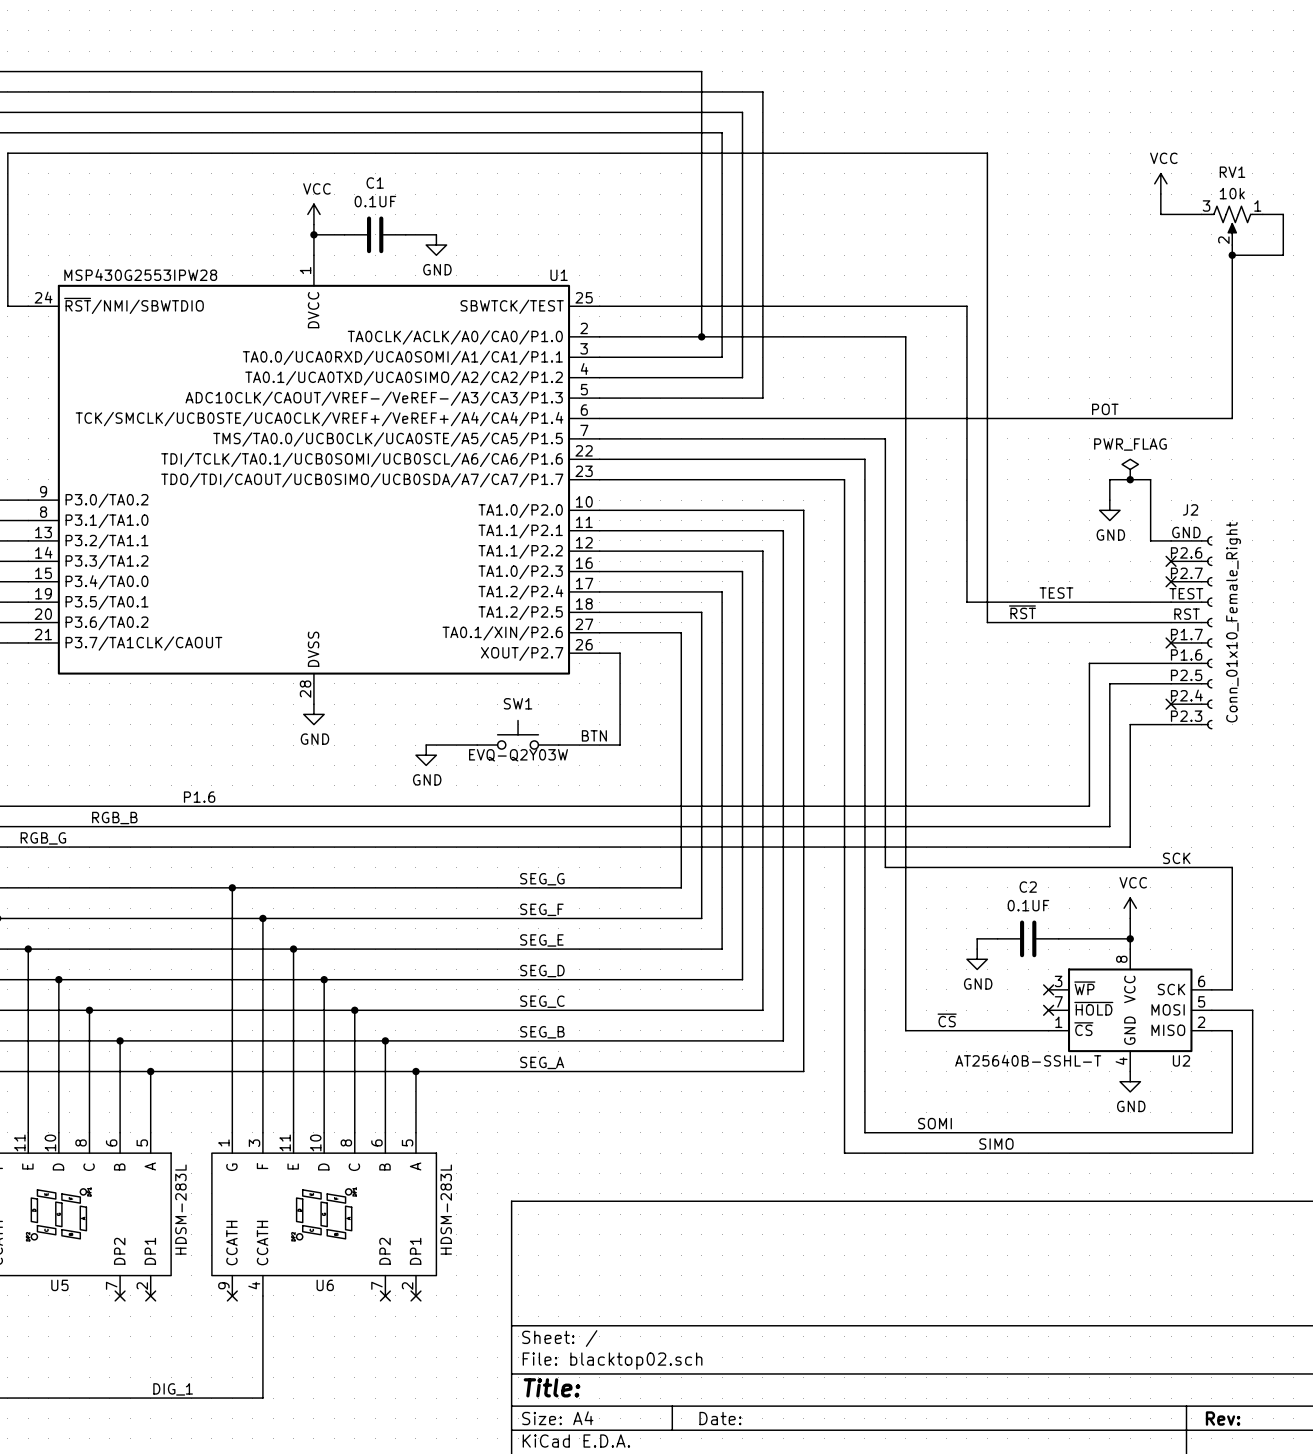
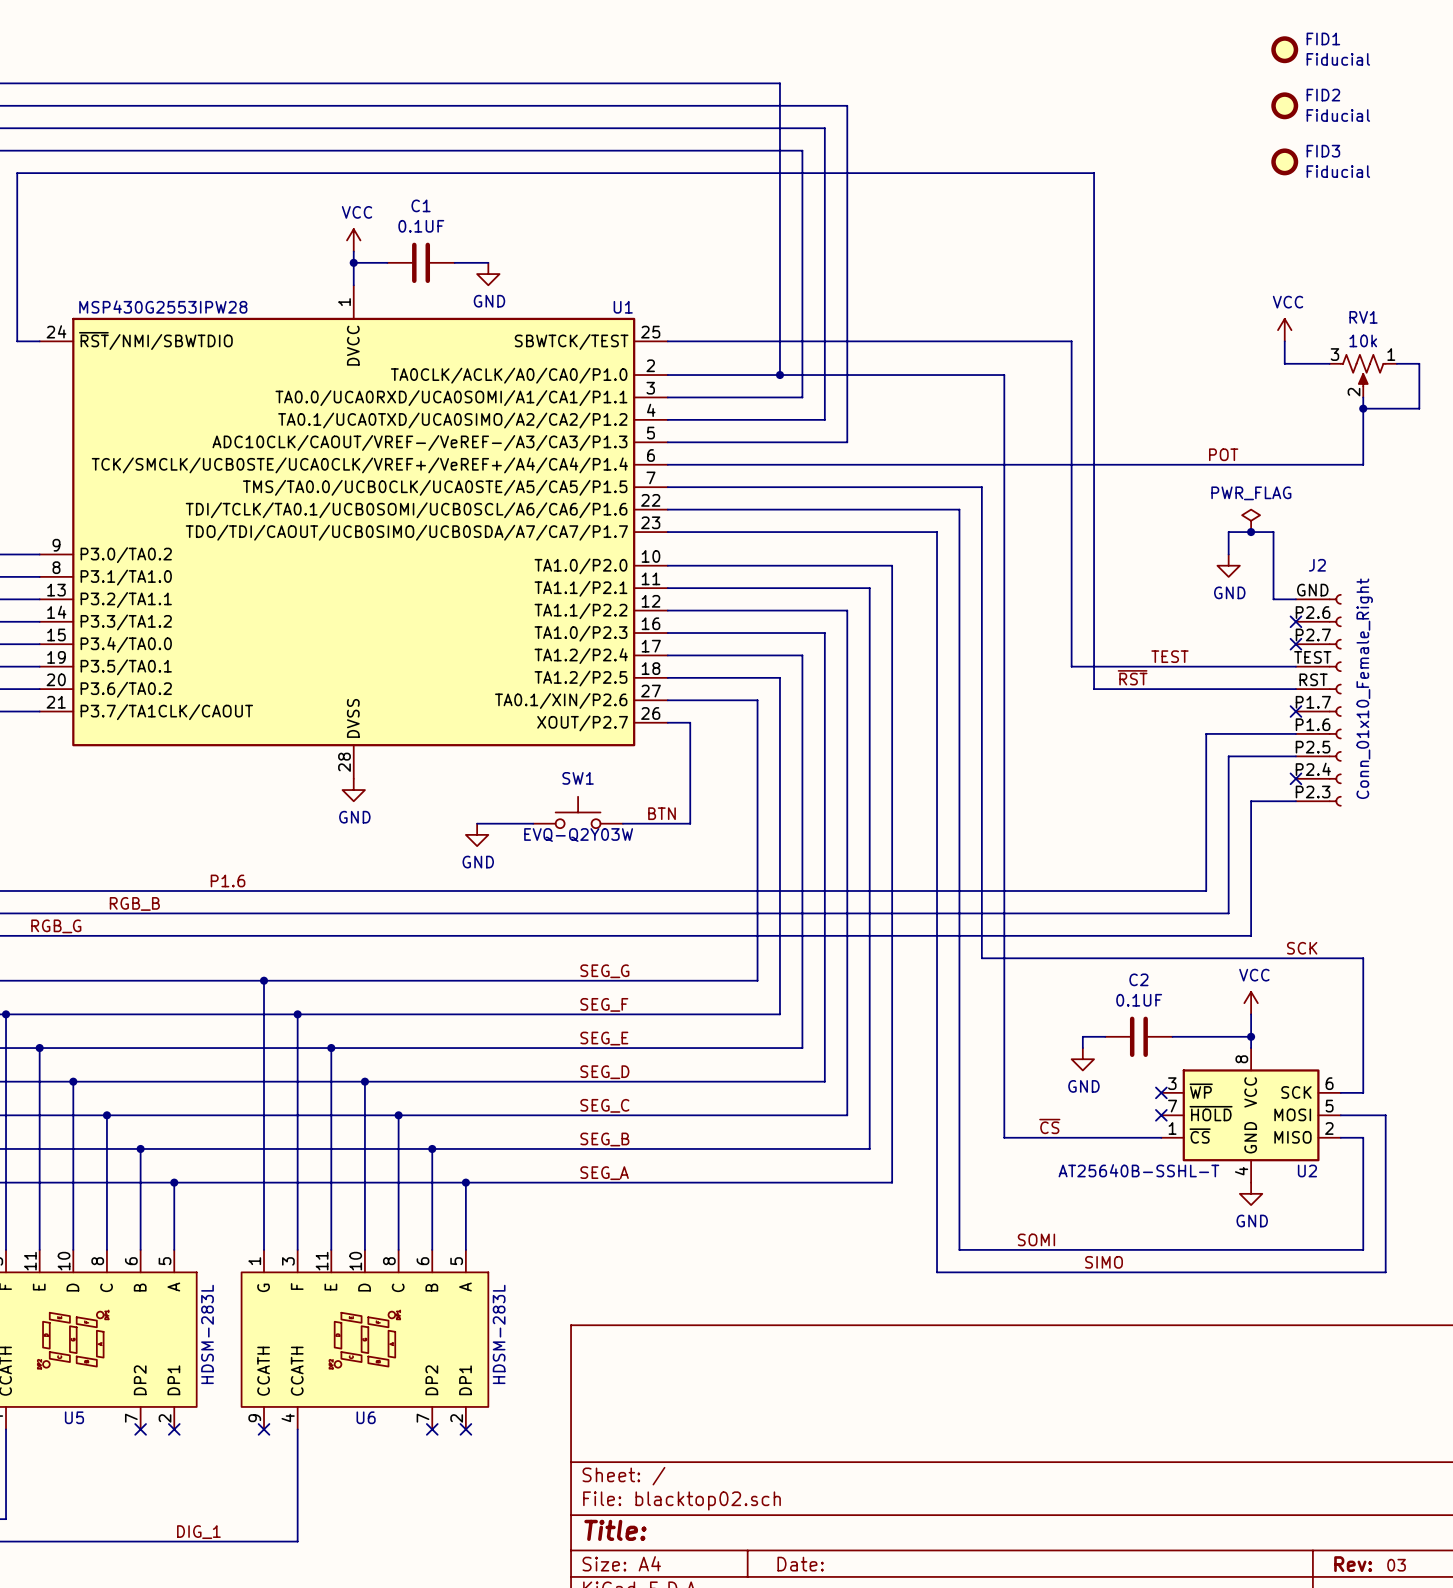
FID1: none -> Fiducial (1284, 49)
FID2: none -> Fiducial (1284, 105)
FID3: none -> Fiducial (1284, 161)
power symbol position: VCC (1160, 183) -> VCC (1284, 330)
wire: (1160, 194) (1160, 214) (1201, 214) -> (1284, 341) (1284, 363) (1329, 363)
wire: (1262, 214) (1283, 214) (1283, 255) (1232, 255) -> (1396, 363) (1419, 363) (1419, 408) (1363, 408)
RV1 position: (1232, 225) -> (1363, 376)
wire: (1232, 245) (1232, 357) -> none
junction: (1232, 255) -> none
junction: none -> (1363, 408)
label: none -> 03 (1396, 1565)

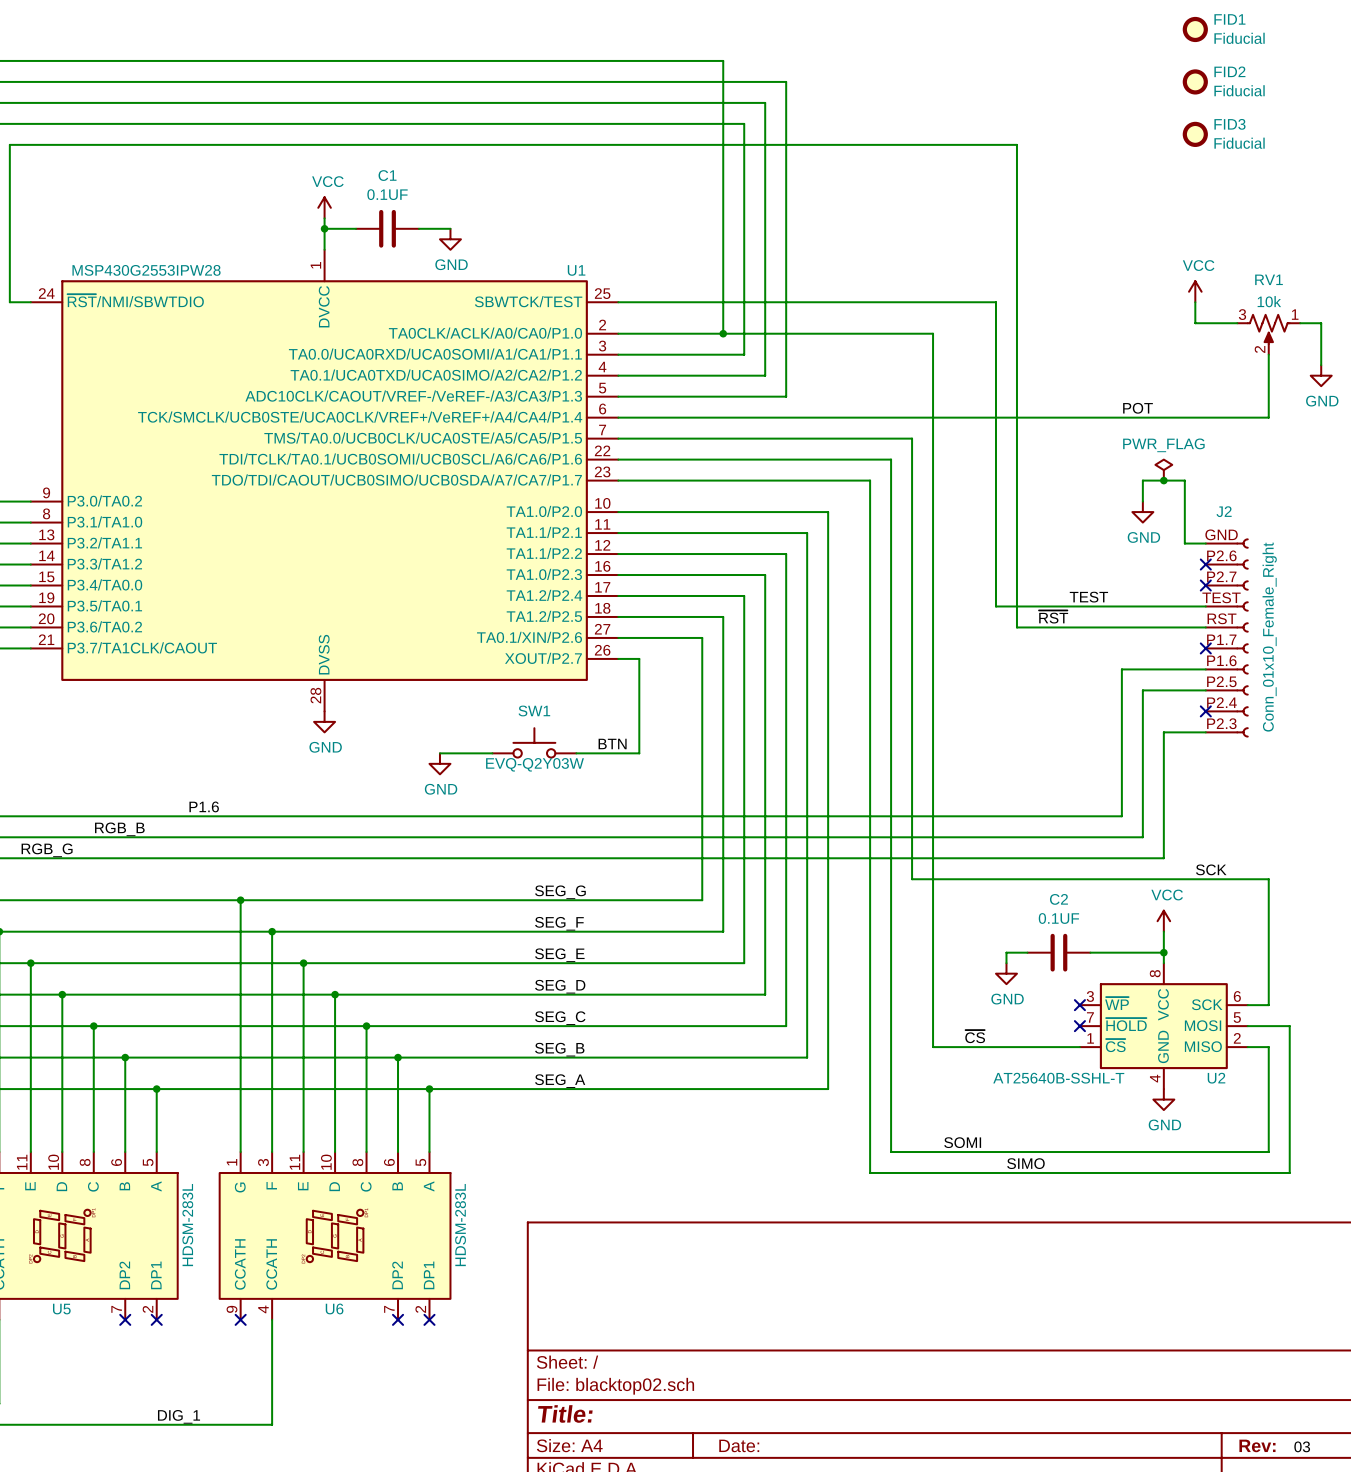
wire: (1363, 408) (1419, 408) -> none
junction: (1363, 408) -> none
power symbol: none -> GND (1321, 375)

